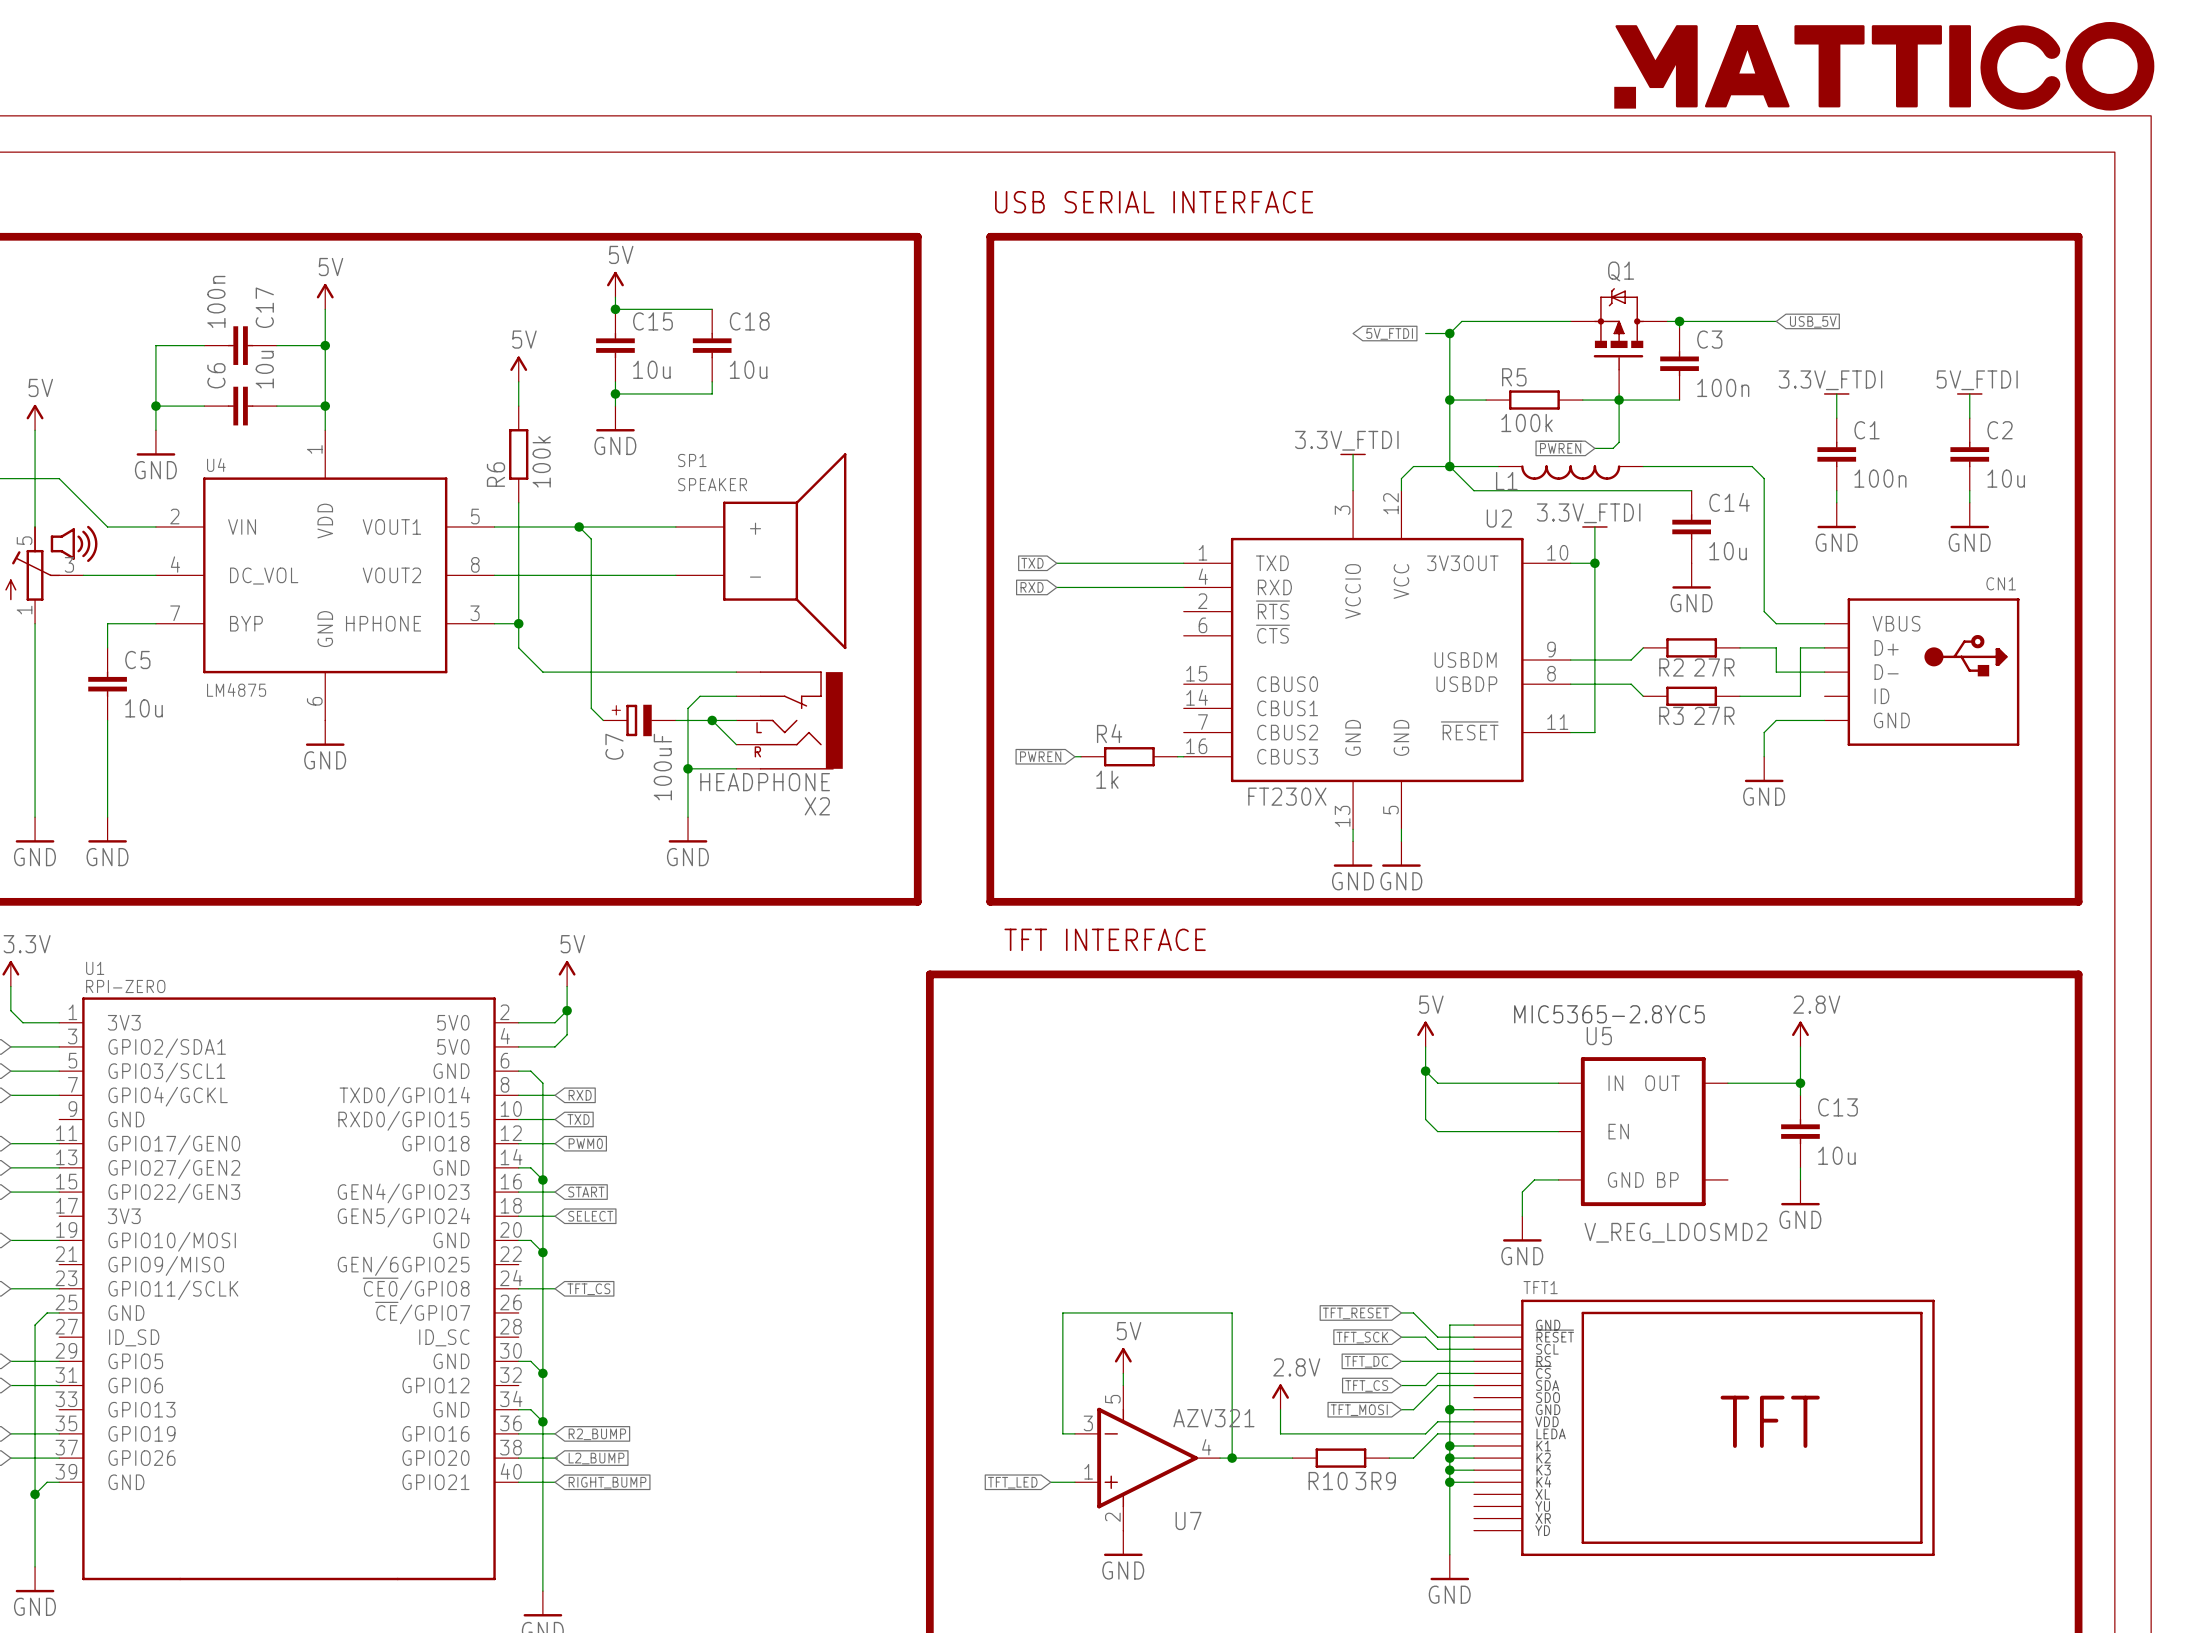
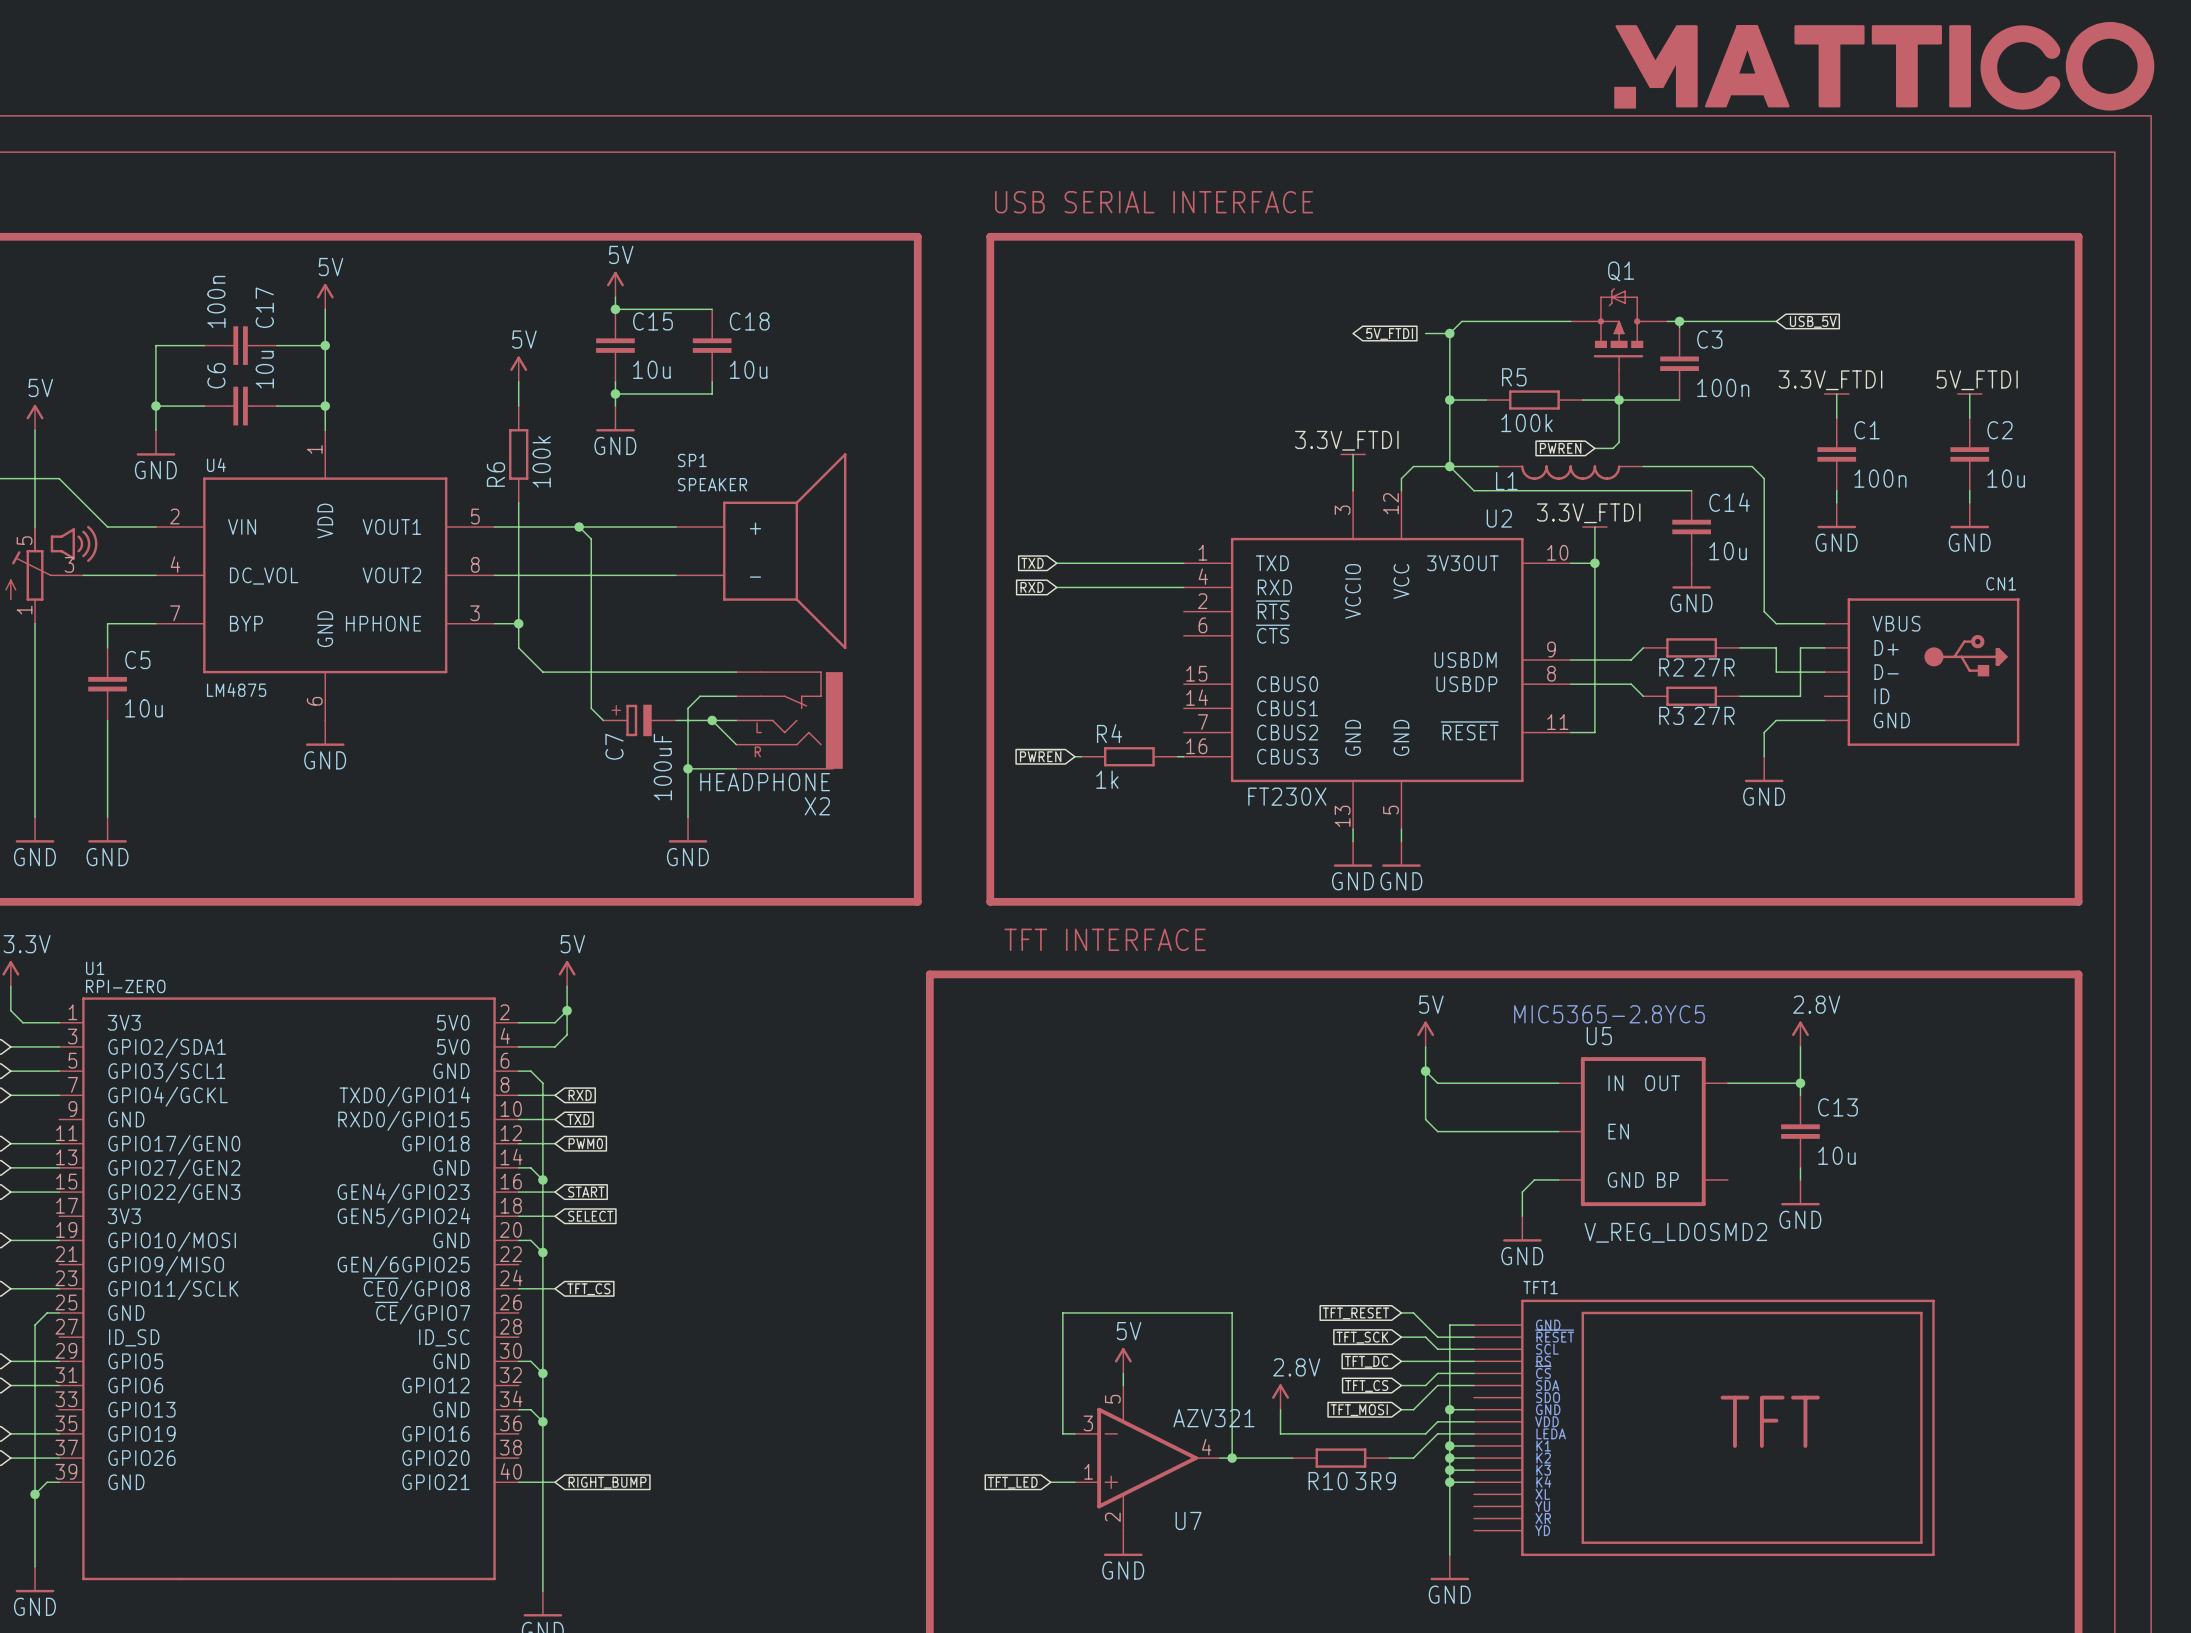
wire: (518, 1433) (554, 1433) -> none
global label: R2_BUMP (597, 1434) -> none
wire: (518, 1458) (557, 1458) -> none
global label: L2_BUMP (596, 1458) -> none

